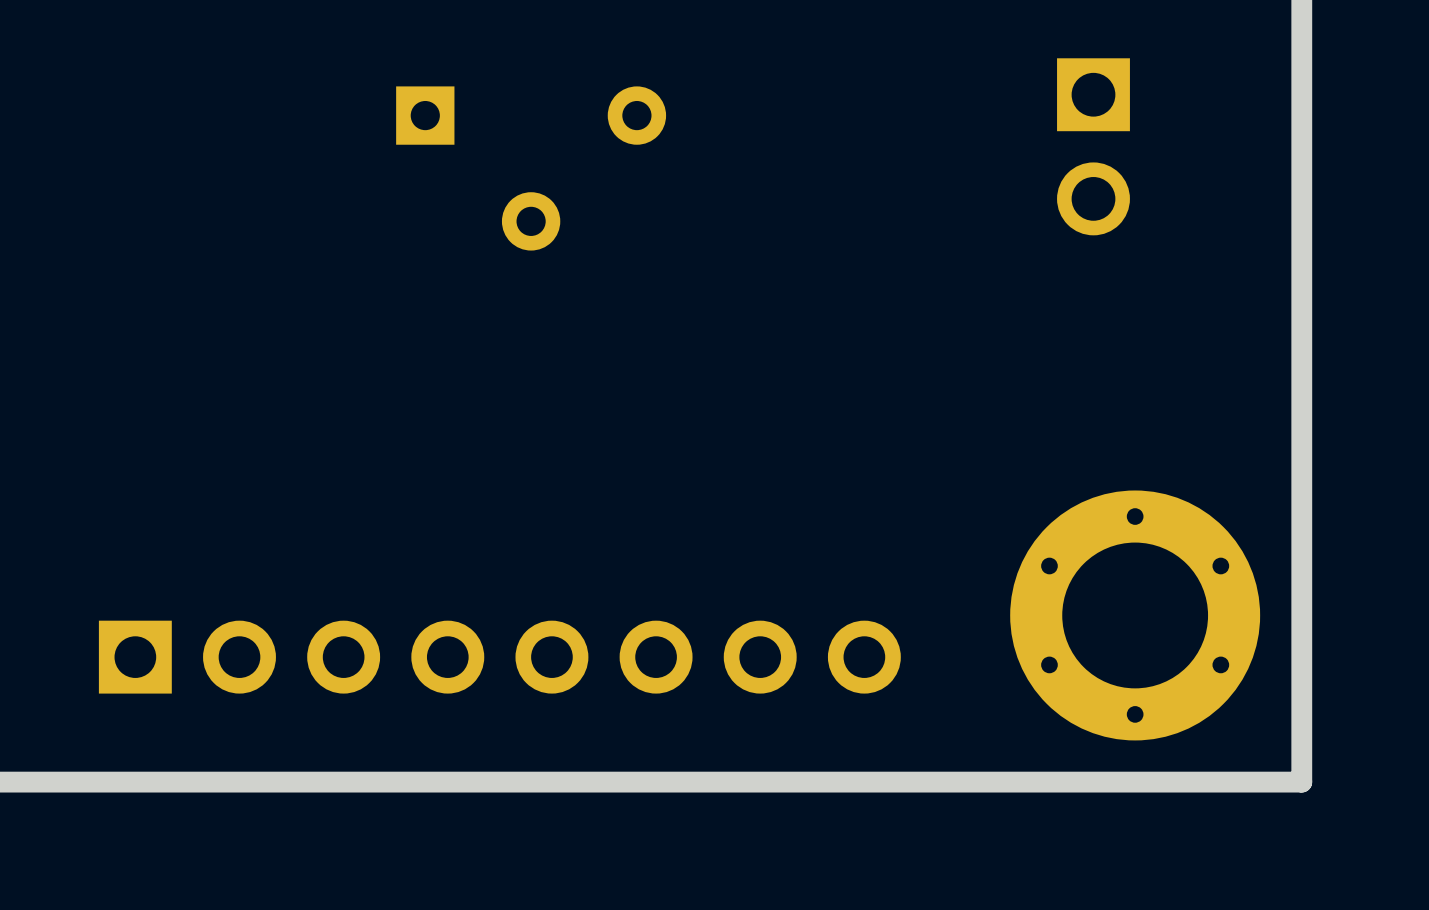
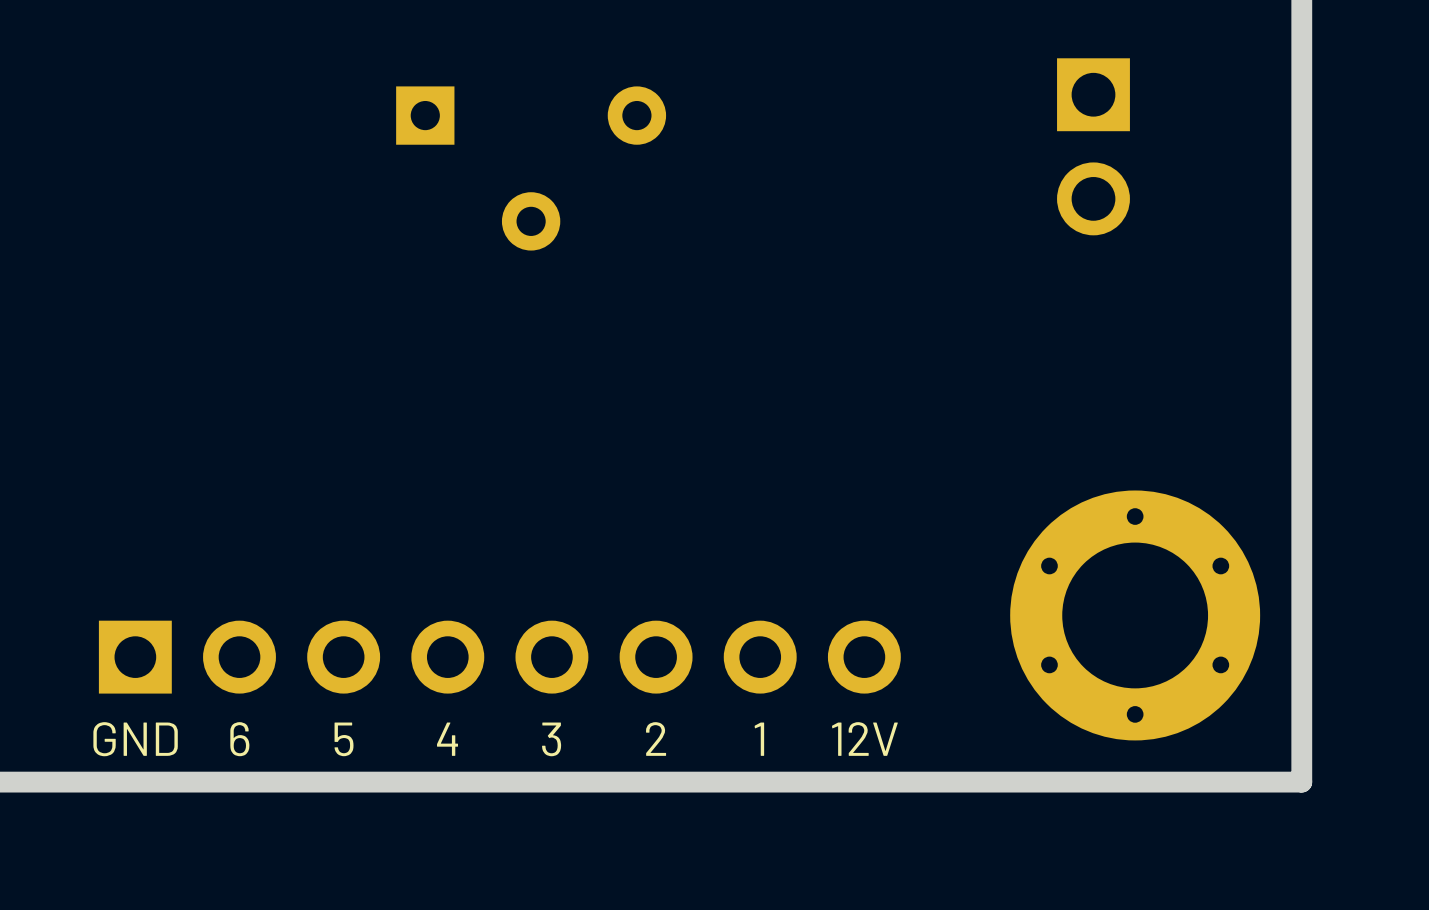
text: none -> GND (135, 739)
text: none -> 6 (239, 739)
text: none -> 5 (344, 739)
text: none -> 4 (447, 739)
text: none -> 3 (551, 739)
text: none -> 2 (656, 739)
text: none -> 1 (759, 739)
text: none -> 12V (864, 739)

